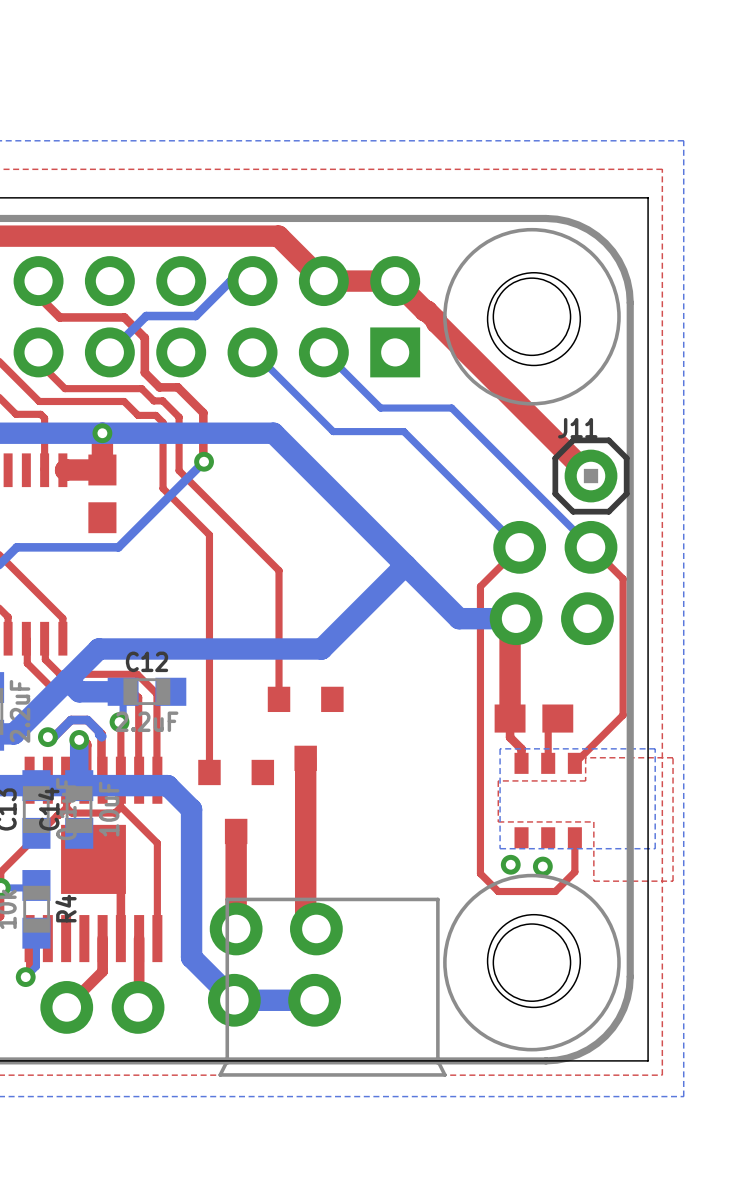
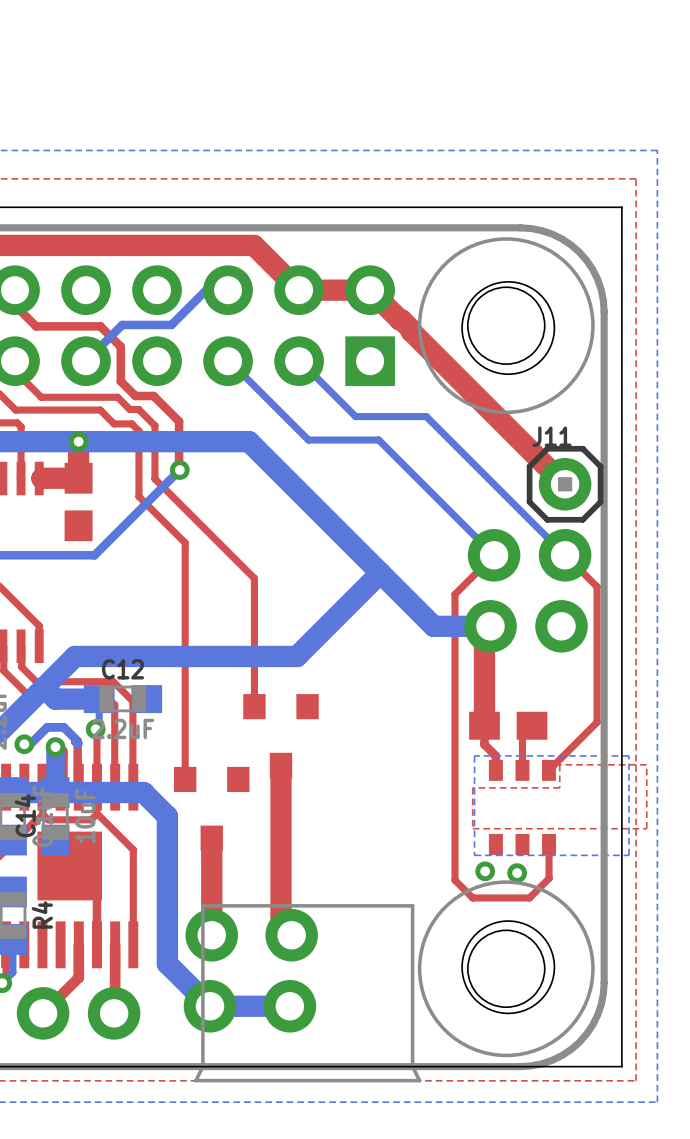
top zone outline: (673, 821) (673, 881) (593, 881) (593, 821) -> (646, 828) (567, 828)

